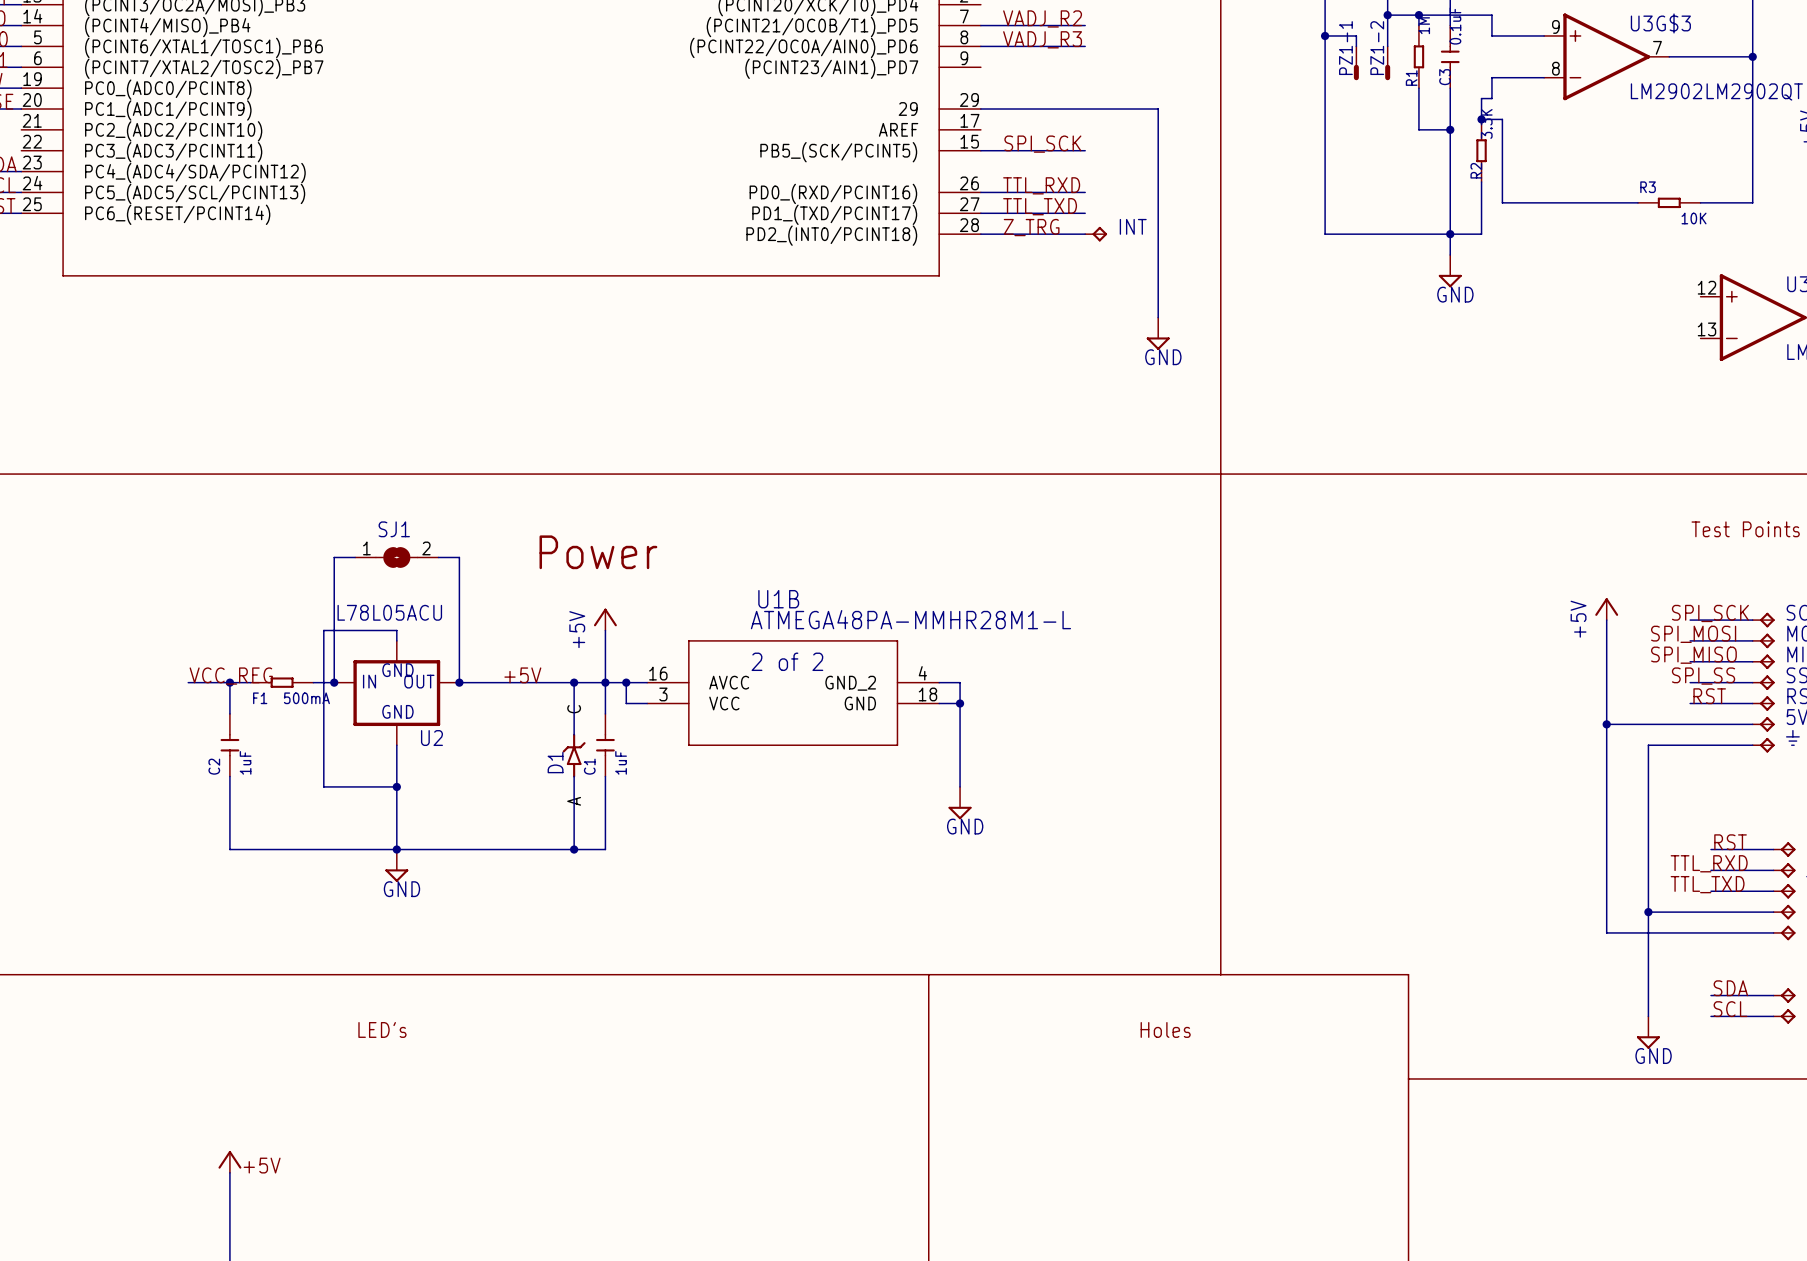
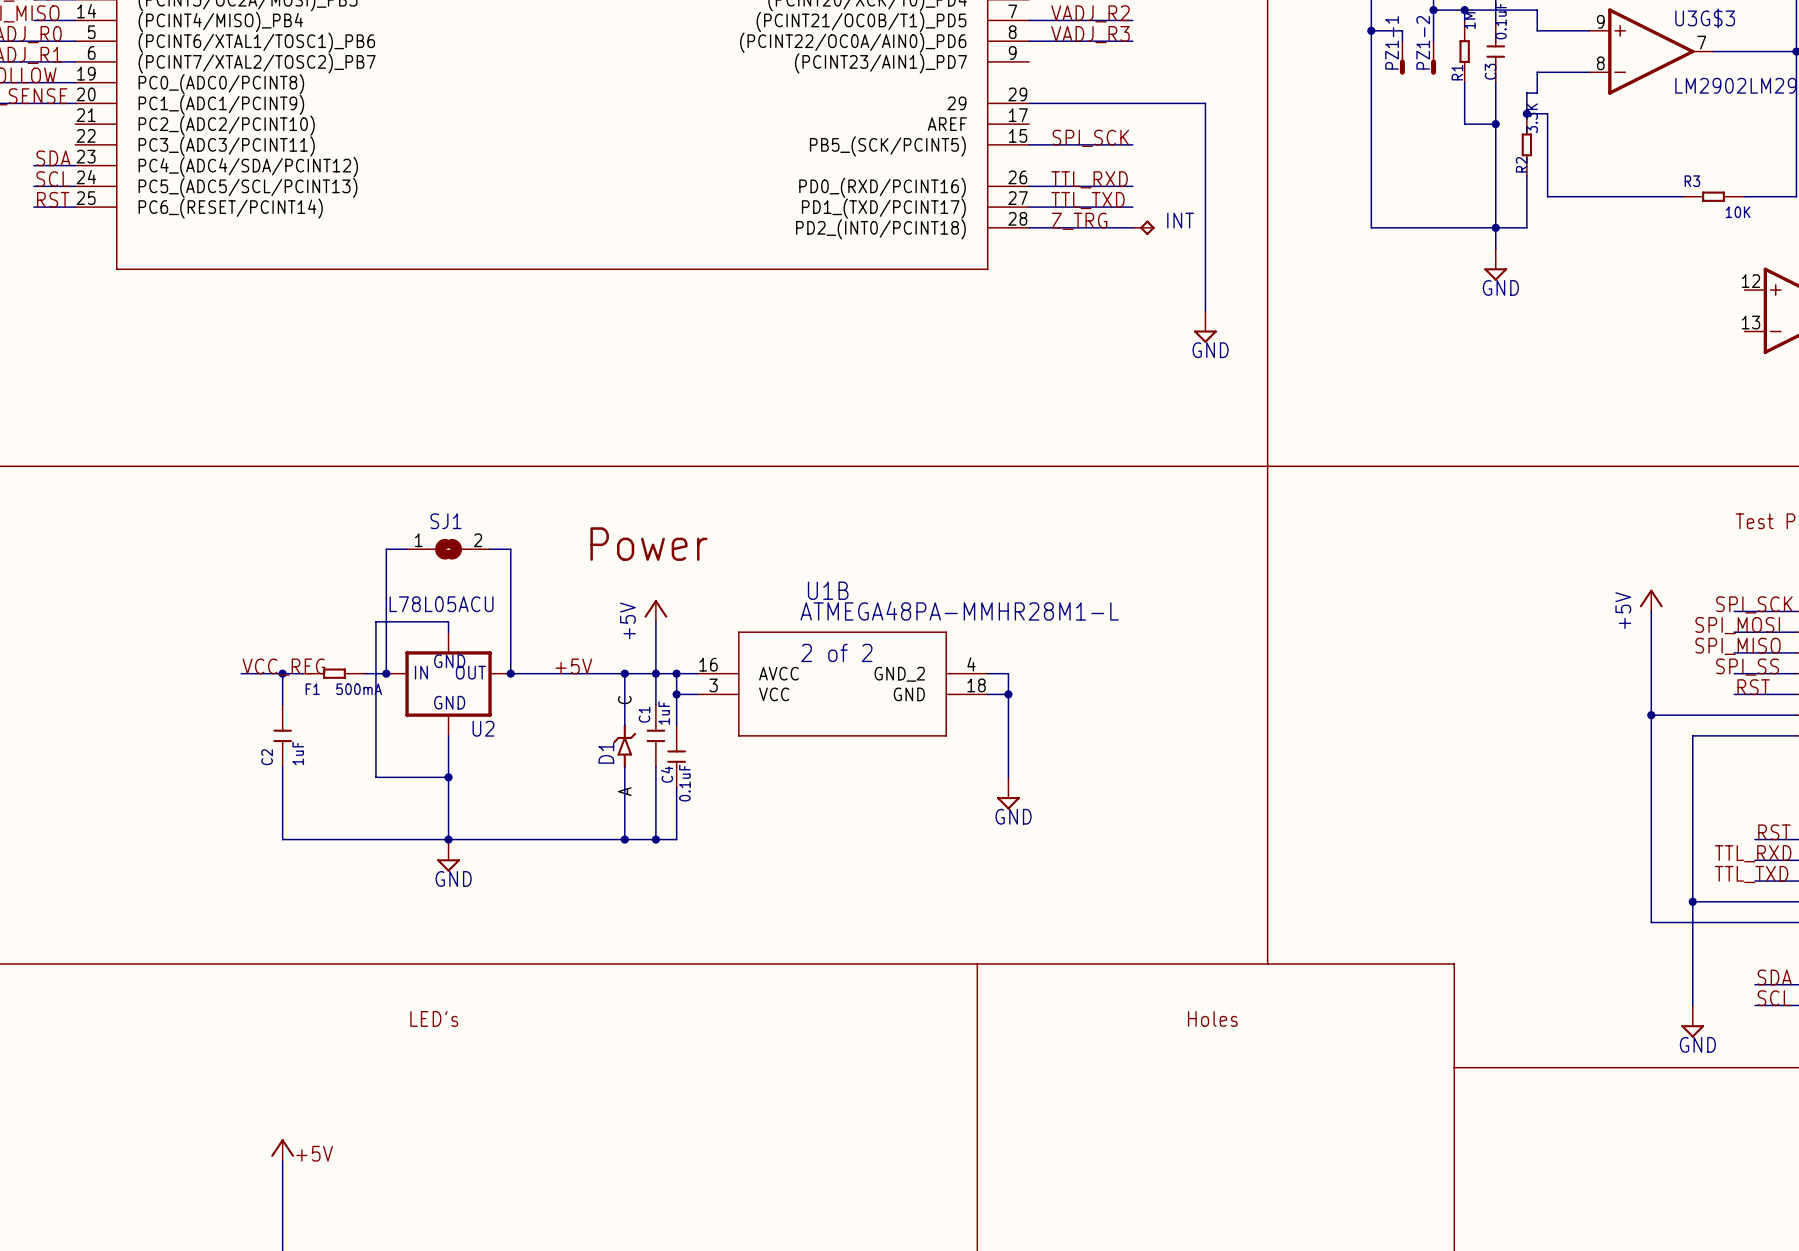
wire: none -> (676, 694) (676, 725)
junction: none -> (676, 694)
C1 value position: 1uF (621, 762) -> 1uF (664, 712)
C1 name position: C1 (589, 766) -> C1 (644, 714)
C4: none -> 0.1uF (676, 756)
wire: none -> (676, 787) (676, 839) (655, 839)
junction: none -> (655, 839)

